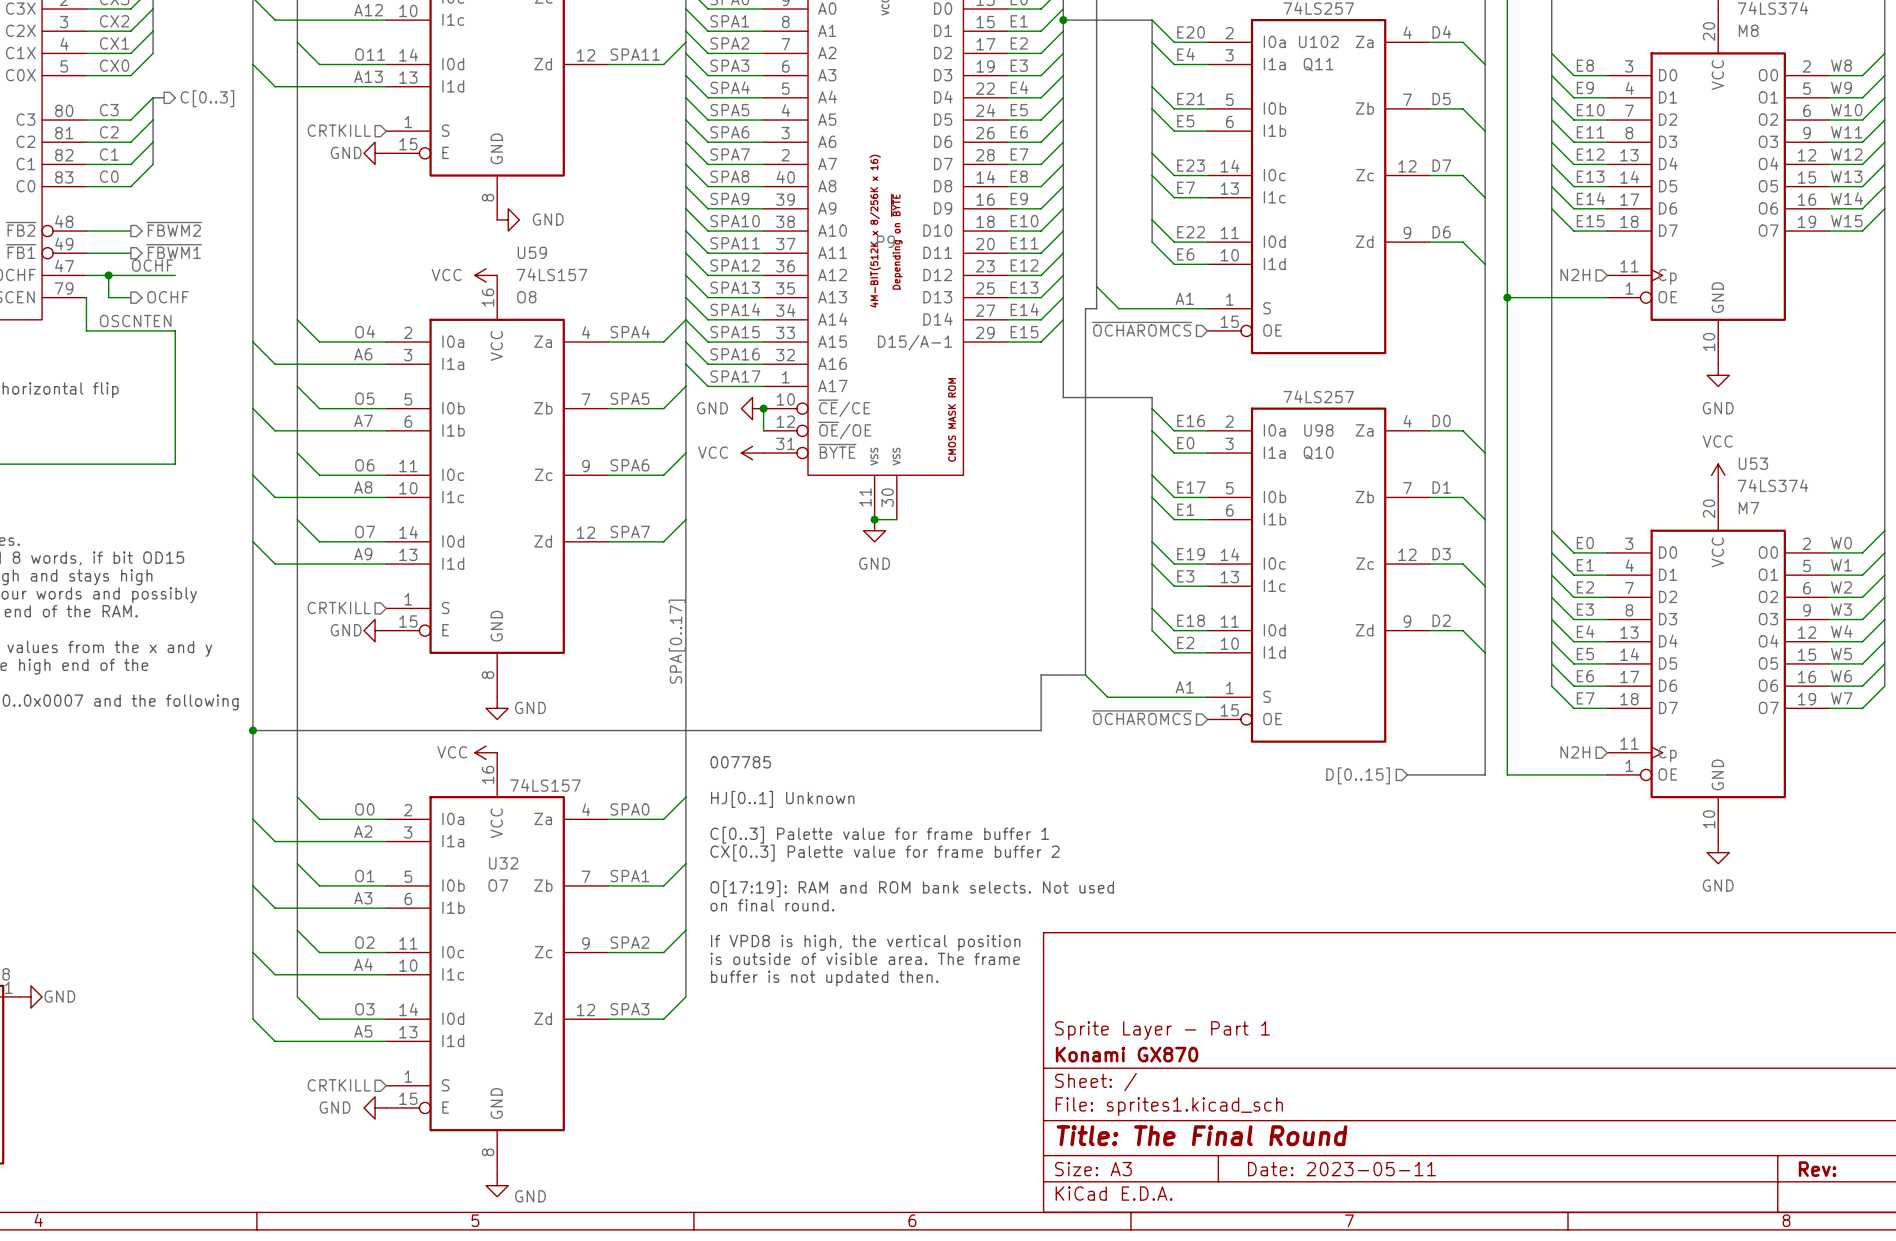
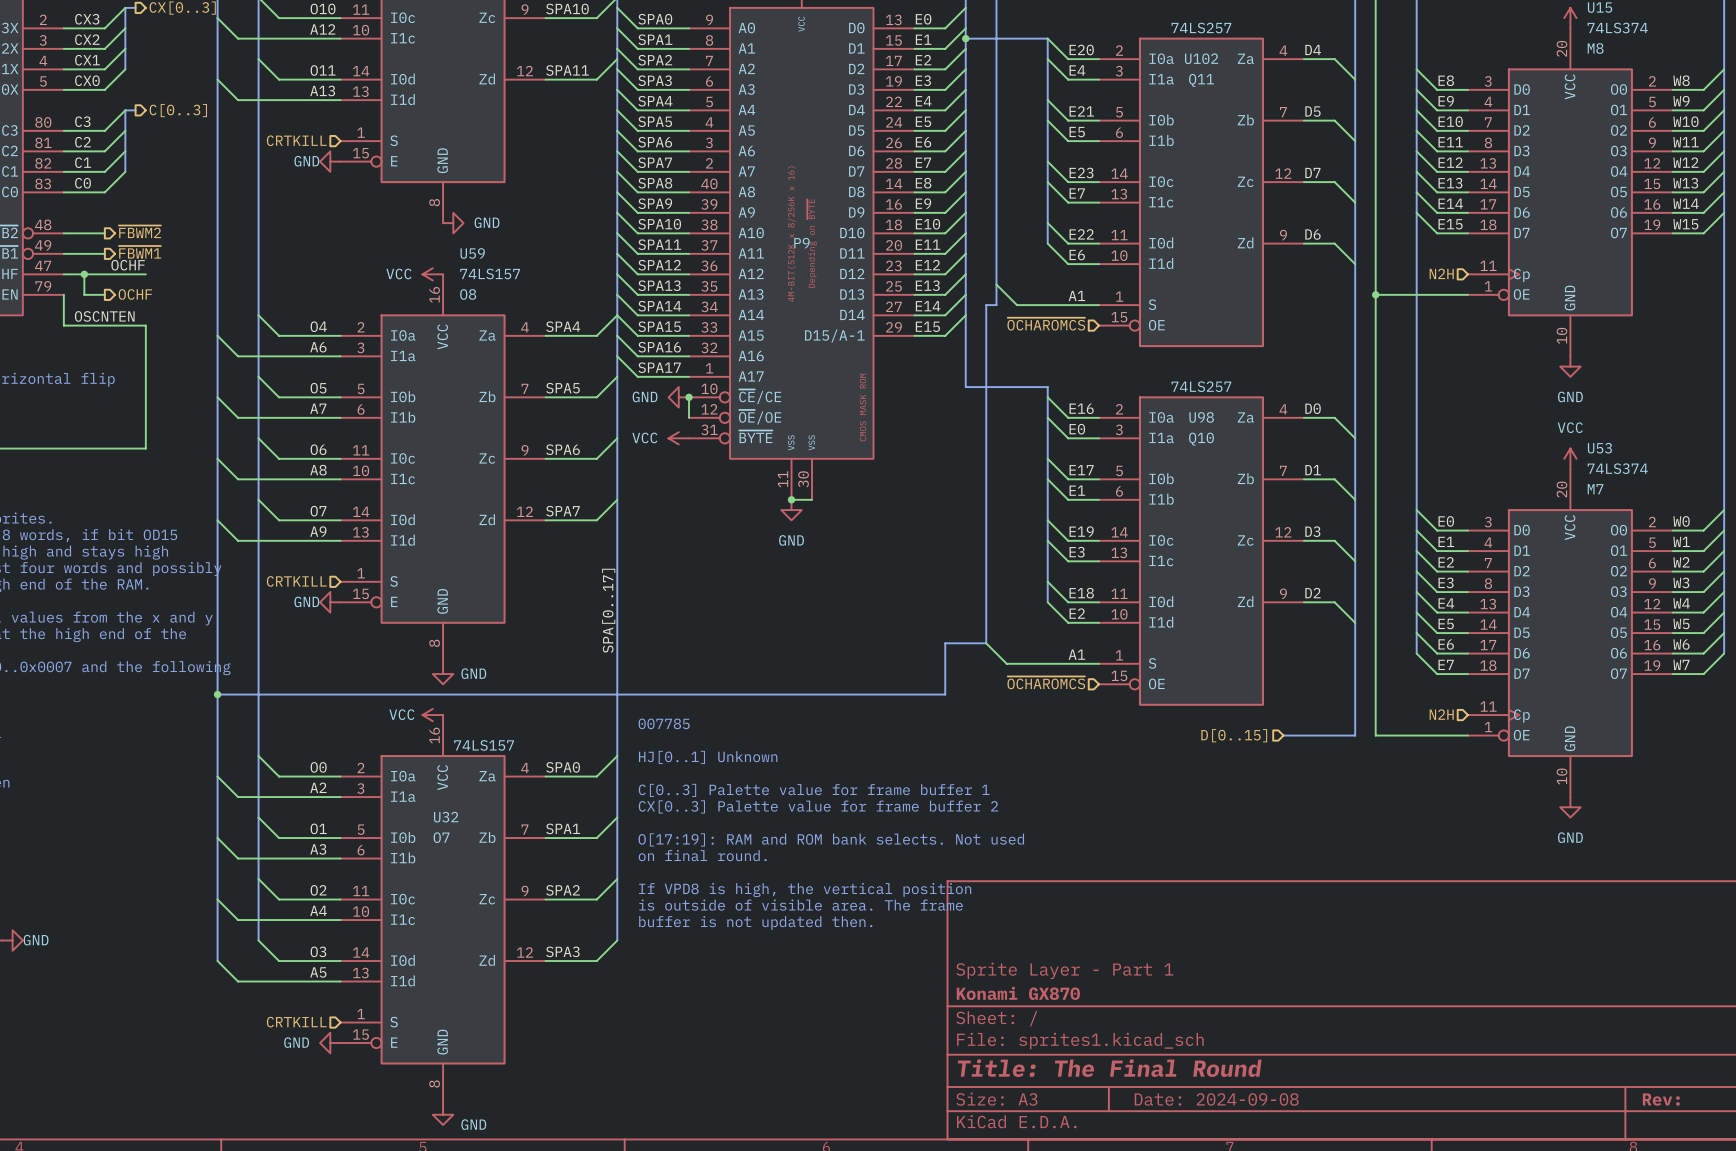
title block: Date: 2023-05-11 (1341, 1169) -> Date: 2024-09-08 (1216, 1099)

